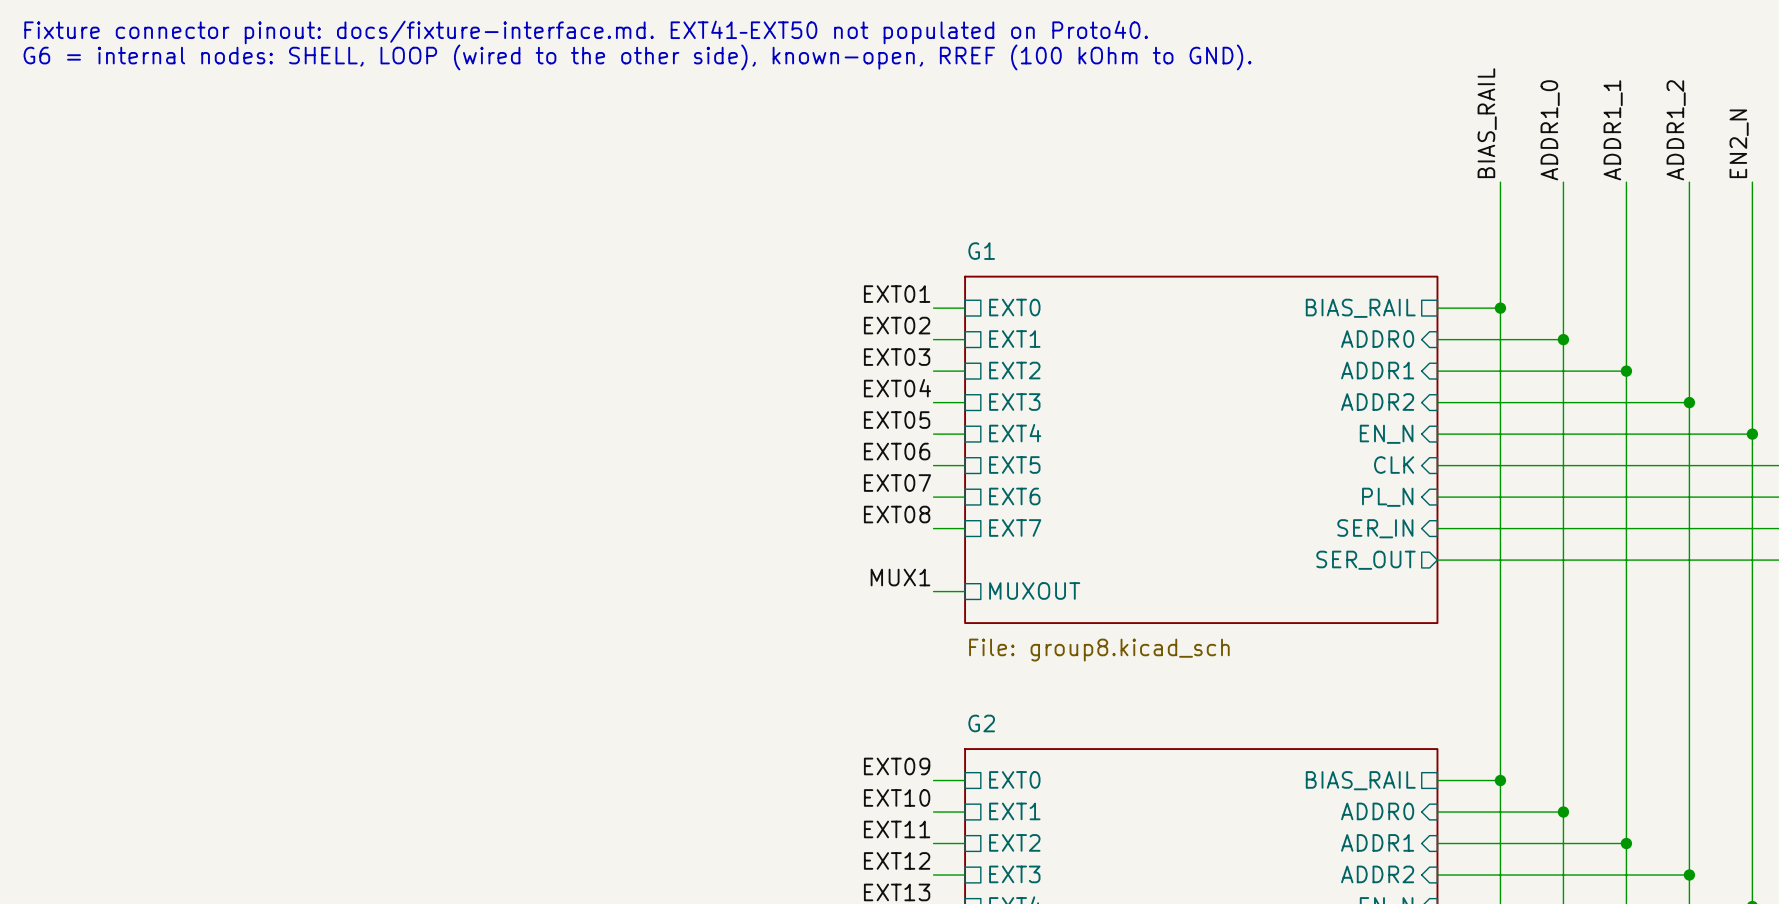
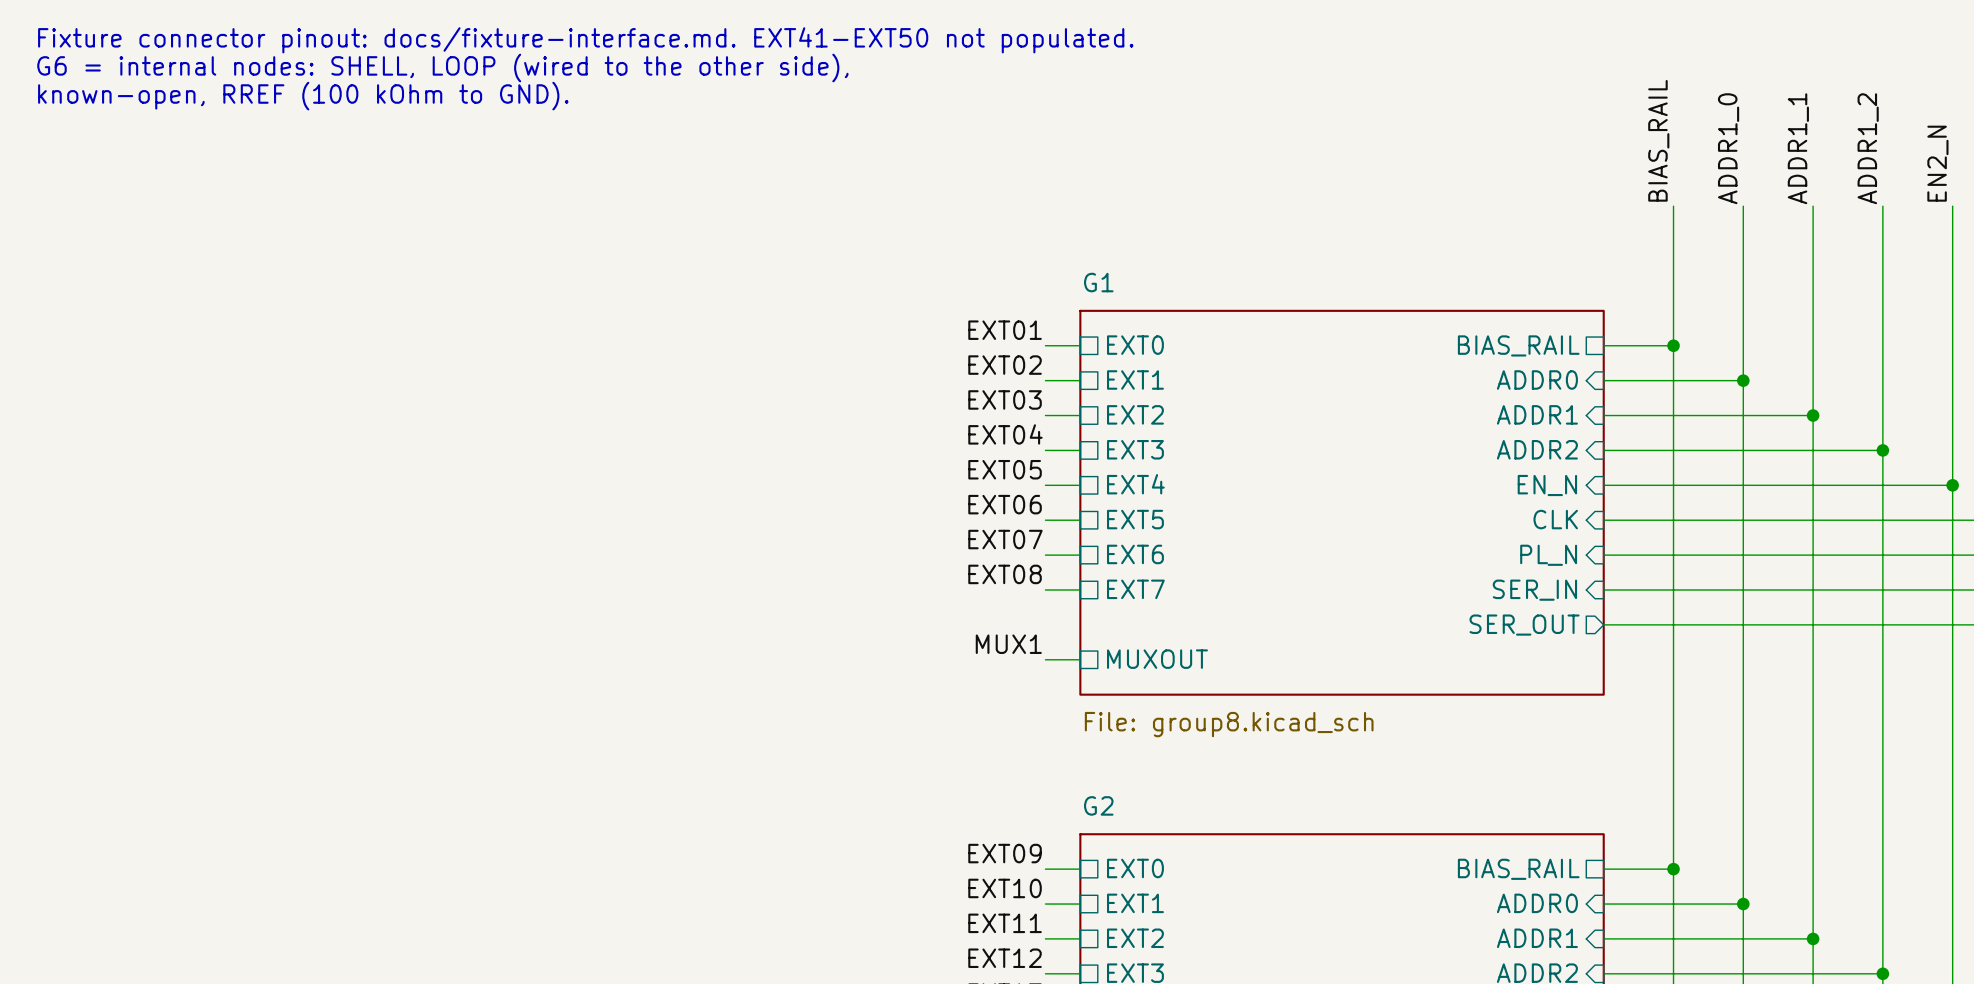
text: Fixture connector pinout: docs/fixture-interface.md. EXT41–EXT50 not populated on Proto40. (586, 32) -> Fixture connector pinout: docs/fixture-interface.md. EXT41-EXT50 not populated. (585, 40)
text: G6 = internal nodes: SHELL, LOOP (wired to the other side), known-open, RREF (100 kOhm to GND). (637, 57) -> G6 = internal nodes: SHELL, LOOP (wired to the other side), (442, 68)
text: none -> known-open, RREF (100 kOhm to GND). (303, 96)

